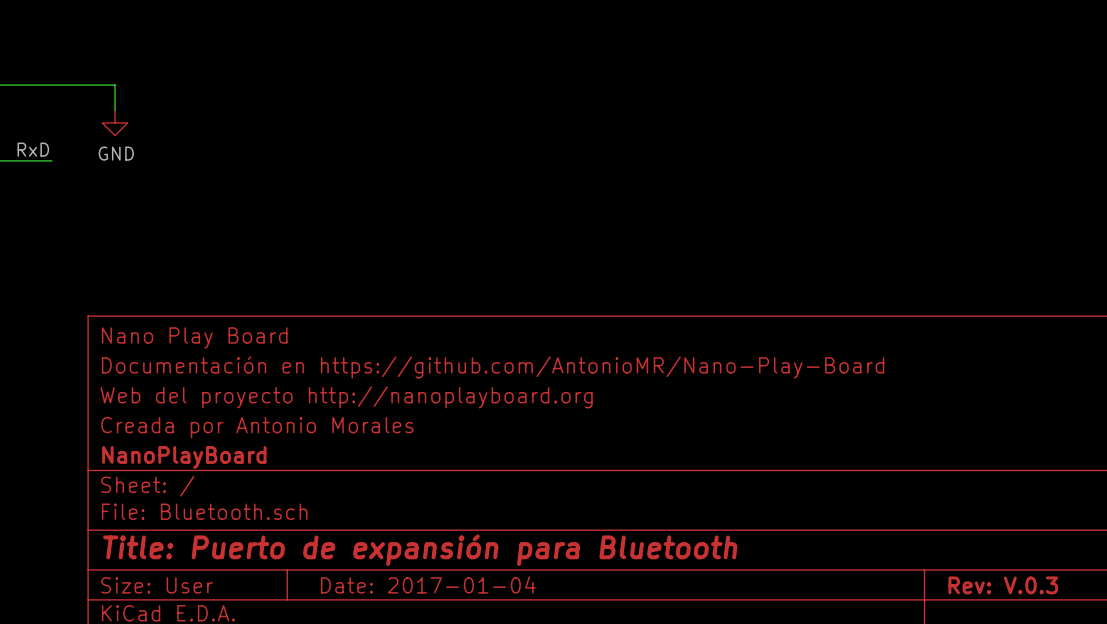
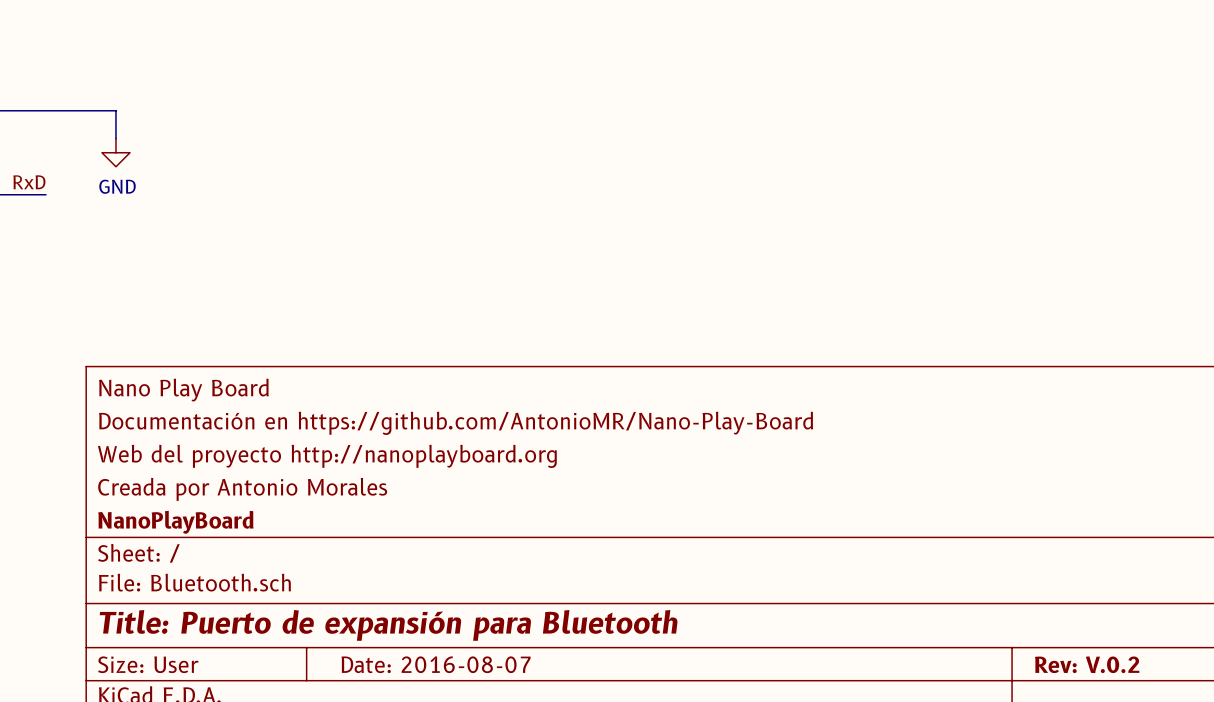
title block: Date: 2017-01-04 (428, 585) -> Date: 2016-08-07 (436, 664)
title block: Rev: V.0.3 (1003, 585) -> Rev: V.0.2 (1087, 664)

